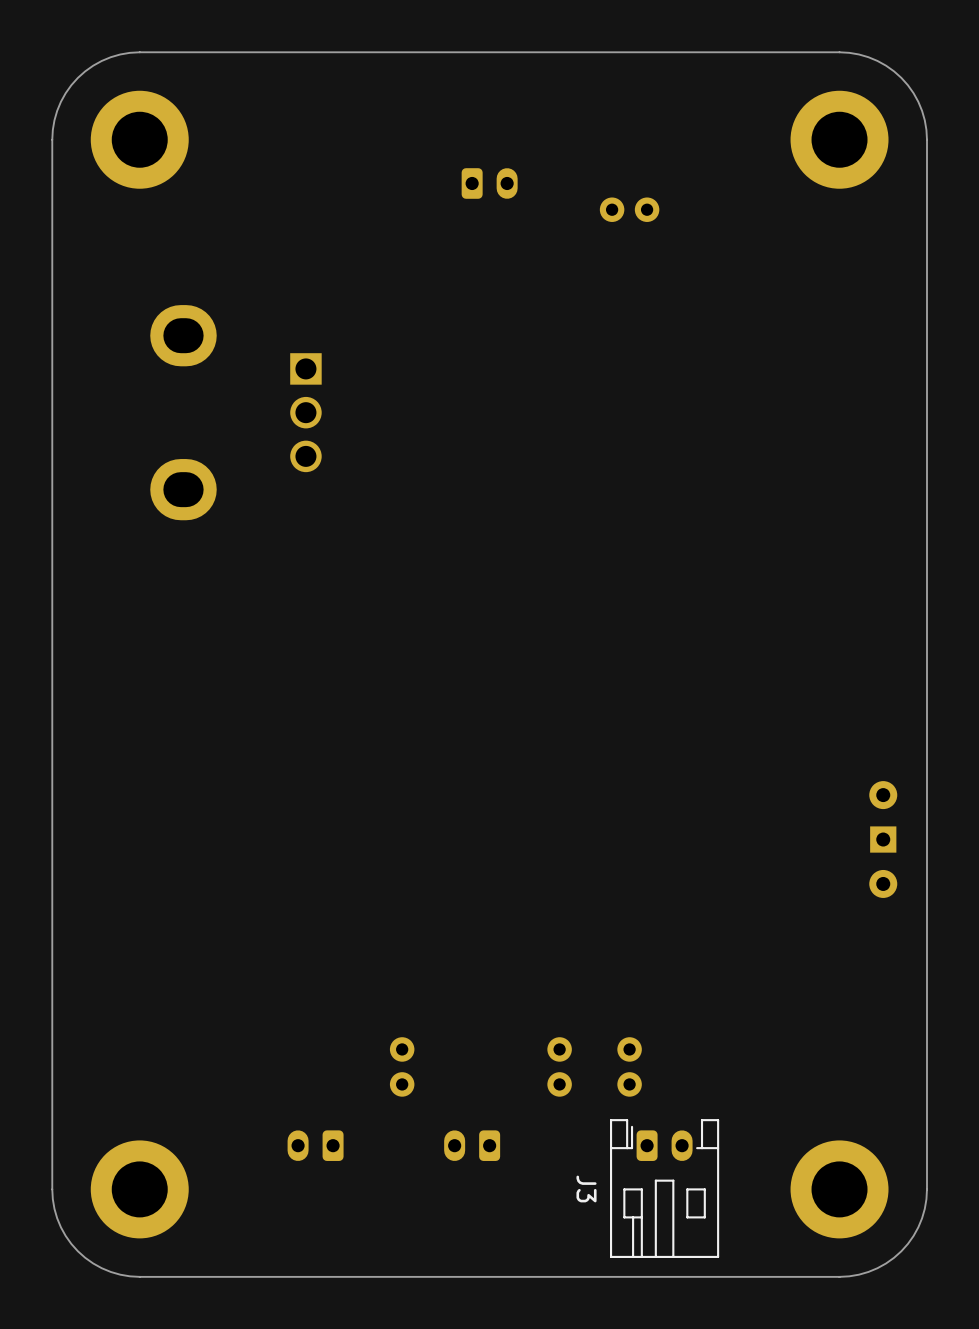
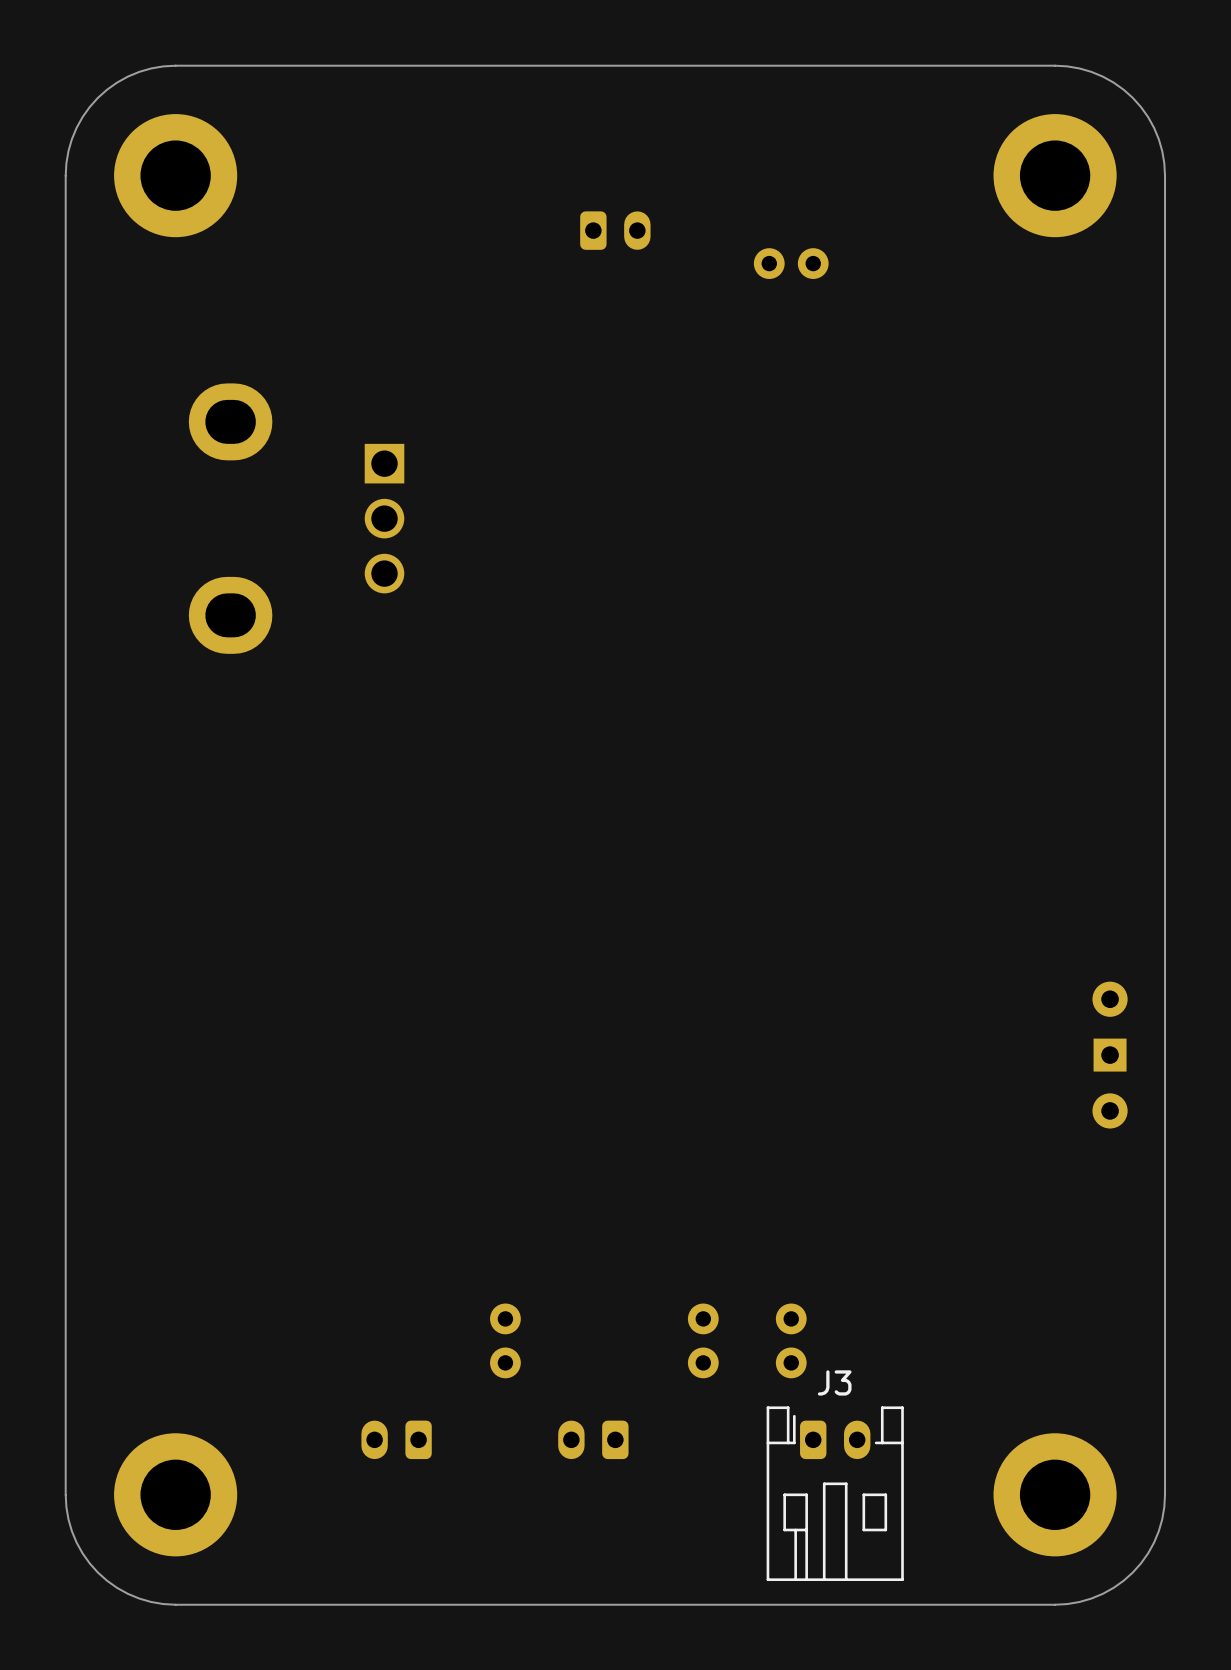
J3 name rotation: 0° (586, 1188) -> 90° counterclockwise (834, 1382)
J3 name position: J3 (586, 1188) -> J3 (834, 1382)

